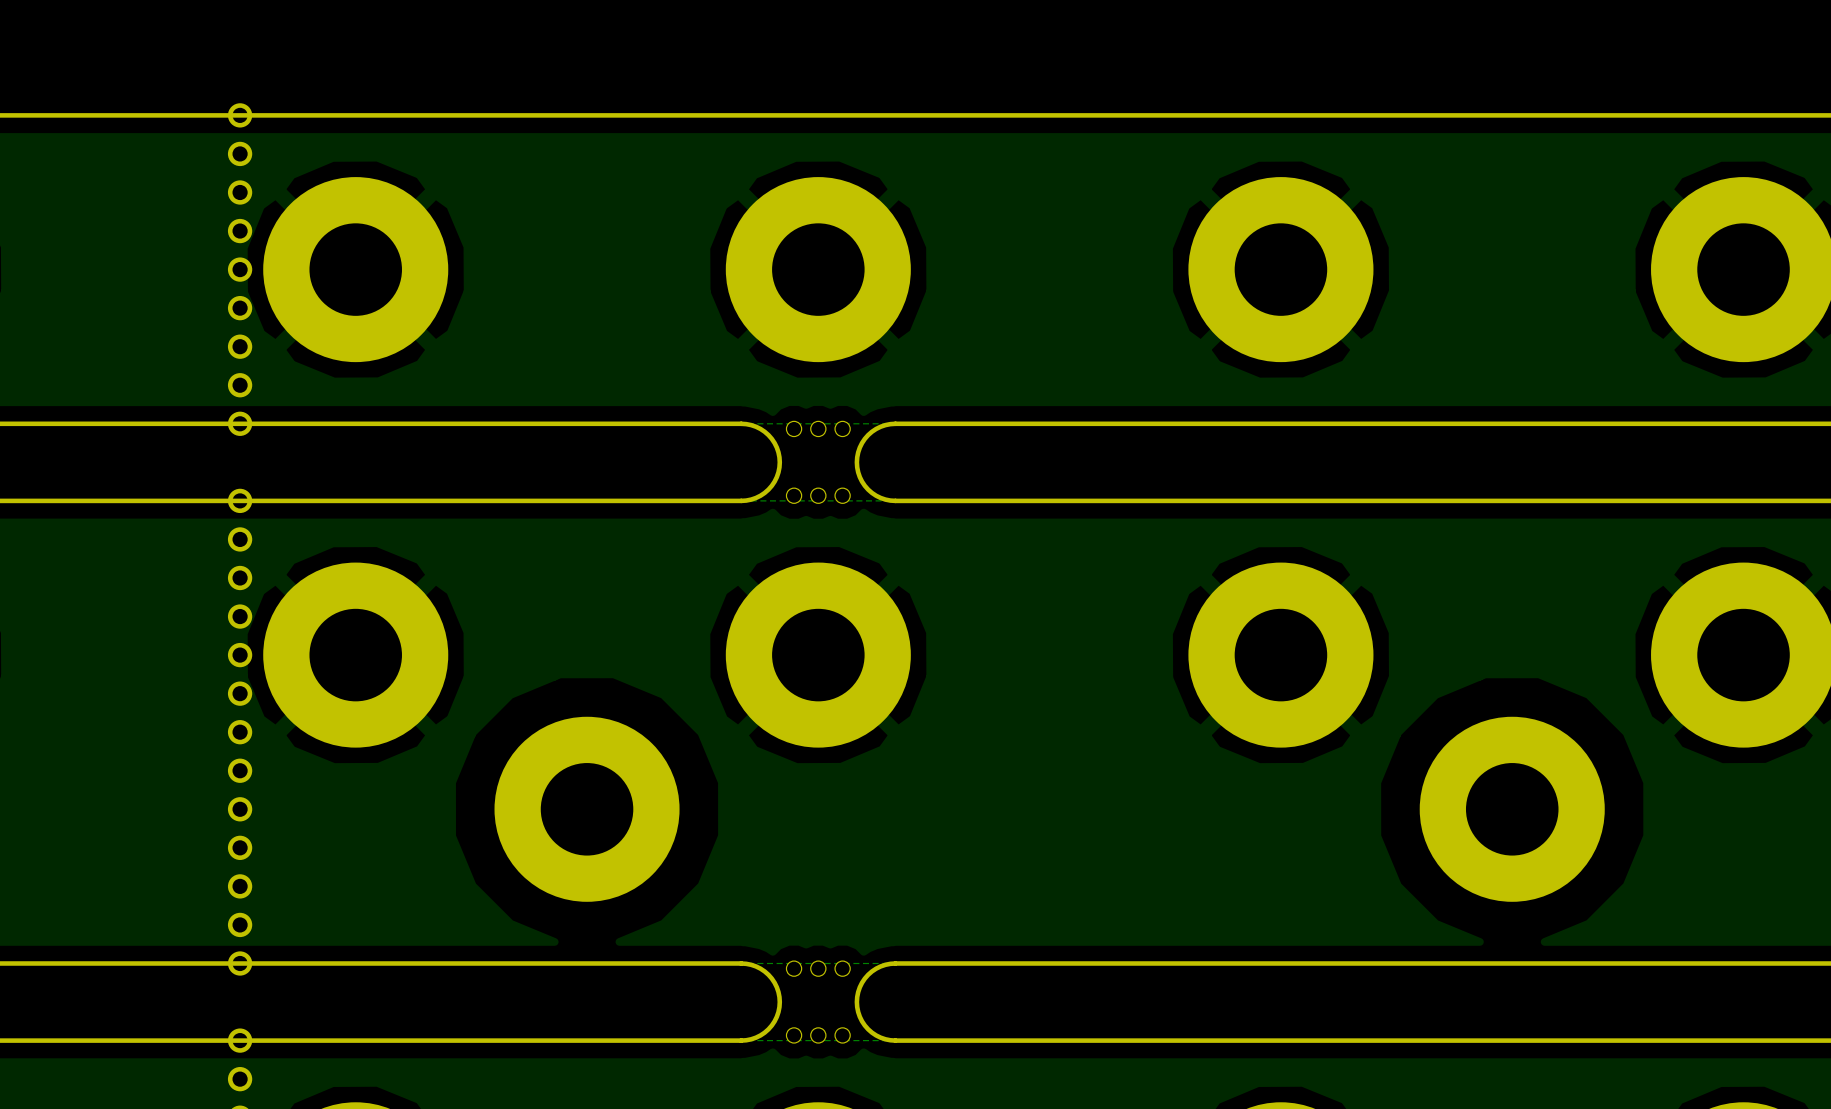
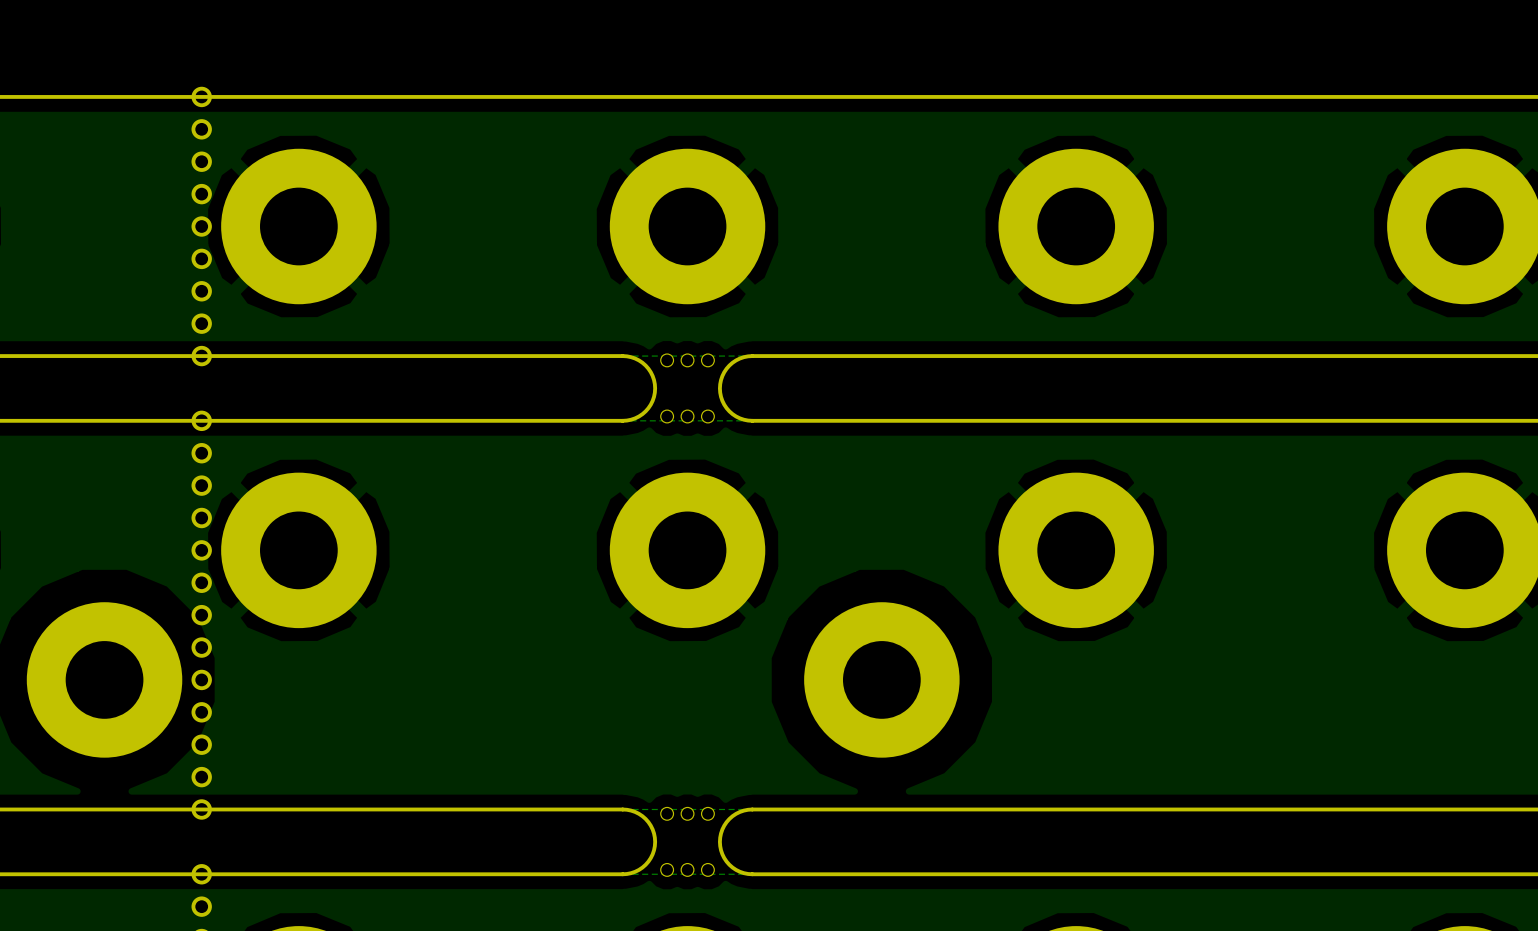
part: none -> (104, 679)
part: (587, 809) -> none
part: none -> (881, 679)
part: (1512, 809) -> none

